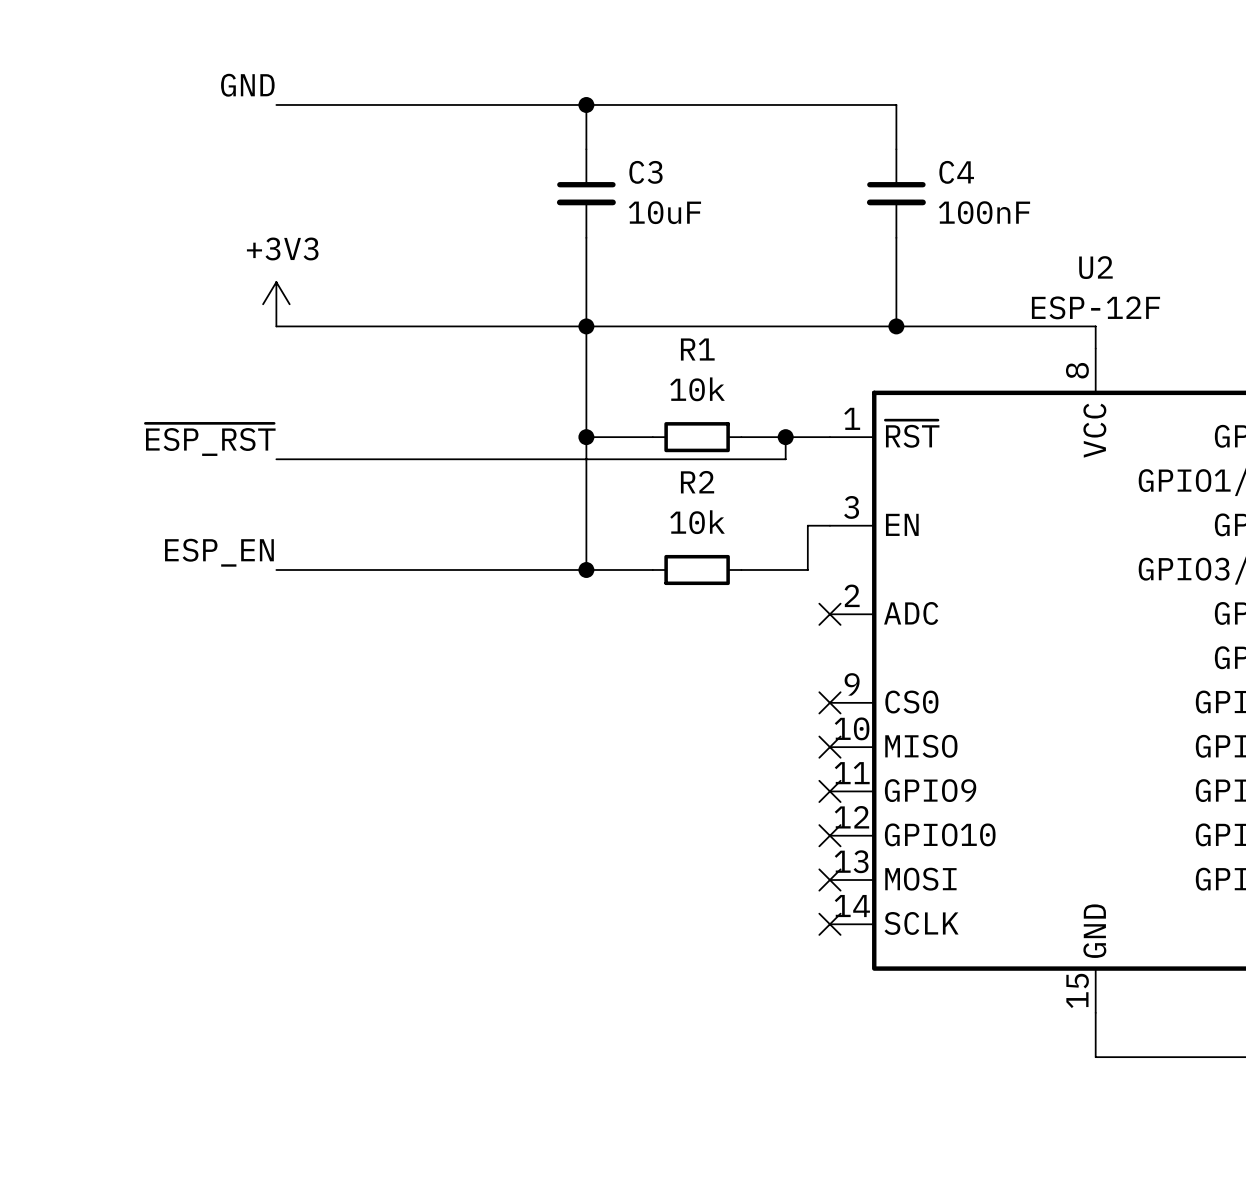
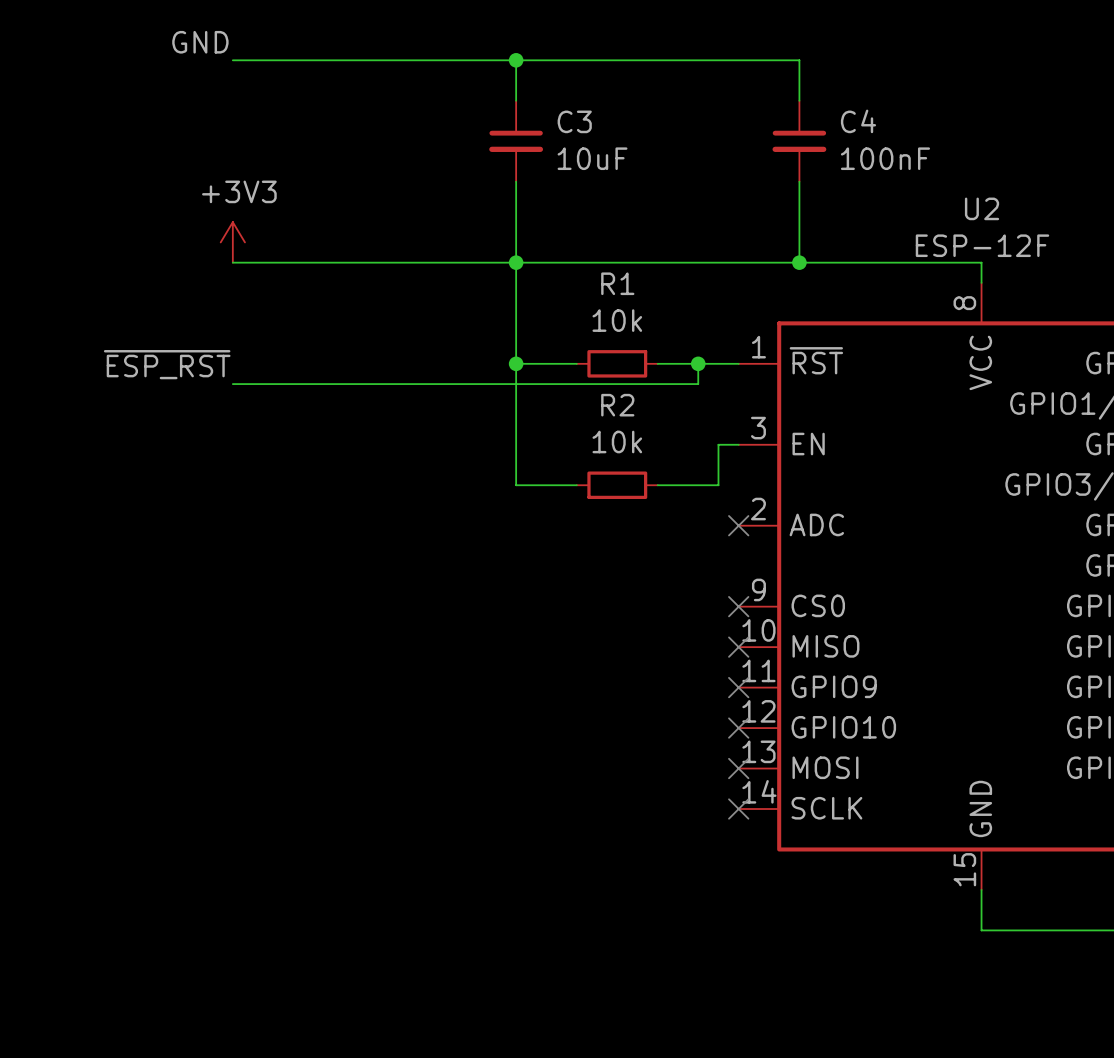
label: ESP_EN (219, 552) -> none
wire: (276, 570) (586, 570) -> none
junction: (586, 570) -> none

